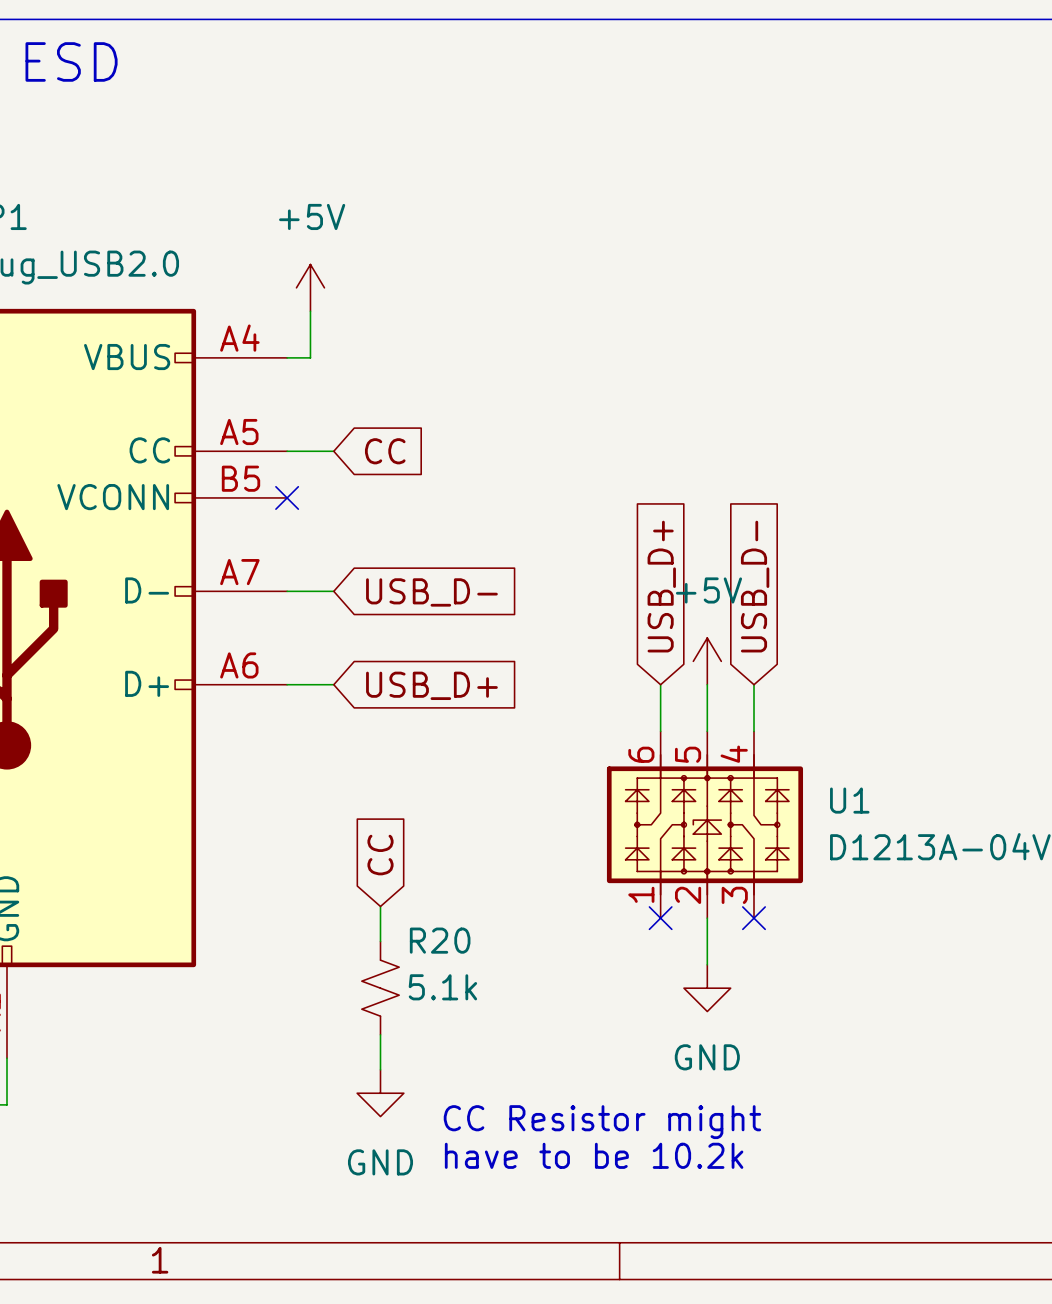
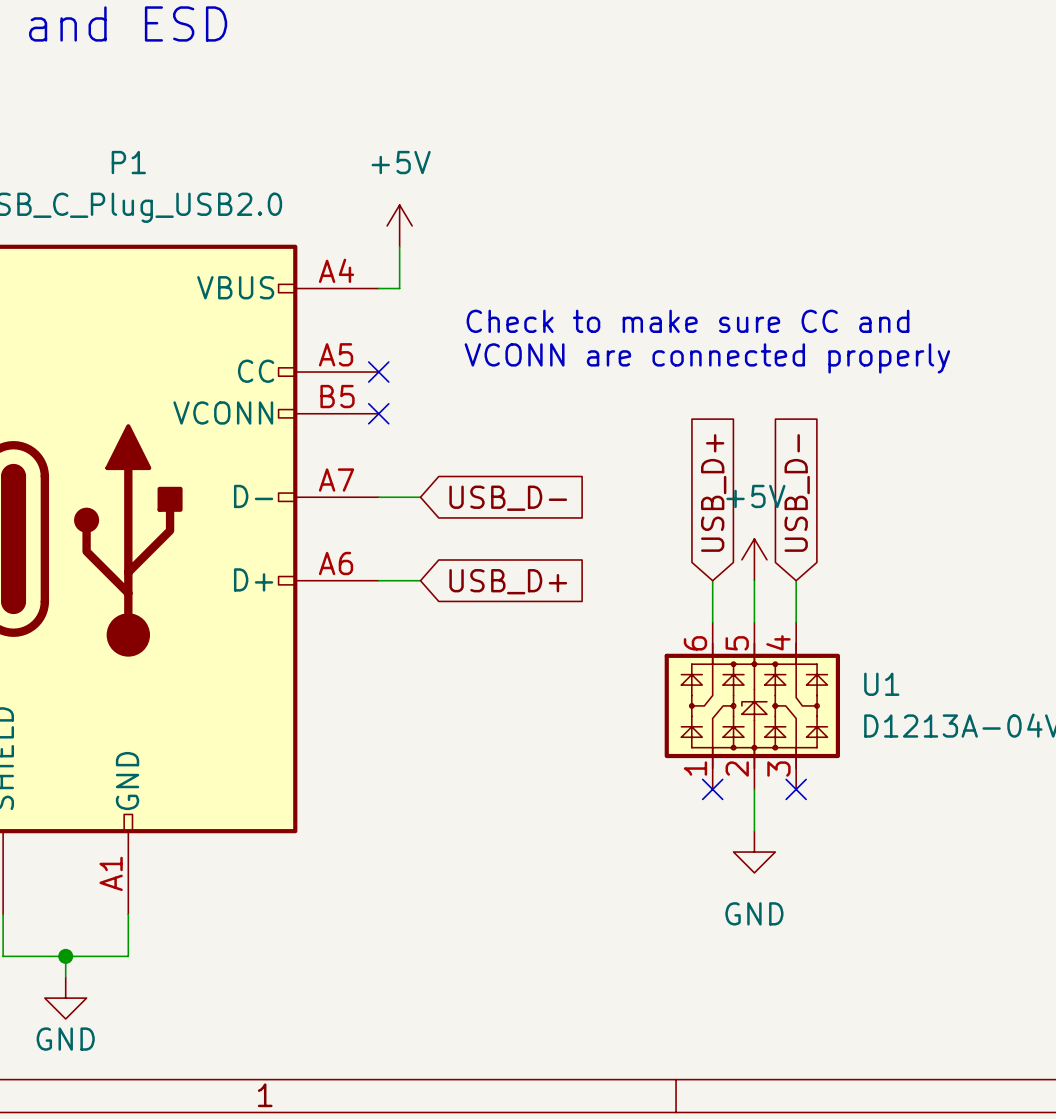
text: none -> Check to make sure CC and (687, 321)
text: none -> VCONN are connected properly (707, 358)
wire: (287, 451) (333, 451) -> none
no-connect mark: none -> (378, 372)
global label: CC (385, 451) -> none
global label: CC (380, 855) -> none
wire: (380, 906) (380, 941) -> none
R20: 5.1k (380, 988) -> none
wire: (380, 1034) (380, 1069) -> none
power symbol: GND (380, 1093) -> none
text: CC Resistor might (602, 1122) -> none
text: have to be 10.2k (594, 1155) -> none

